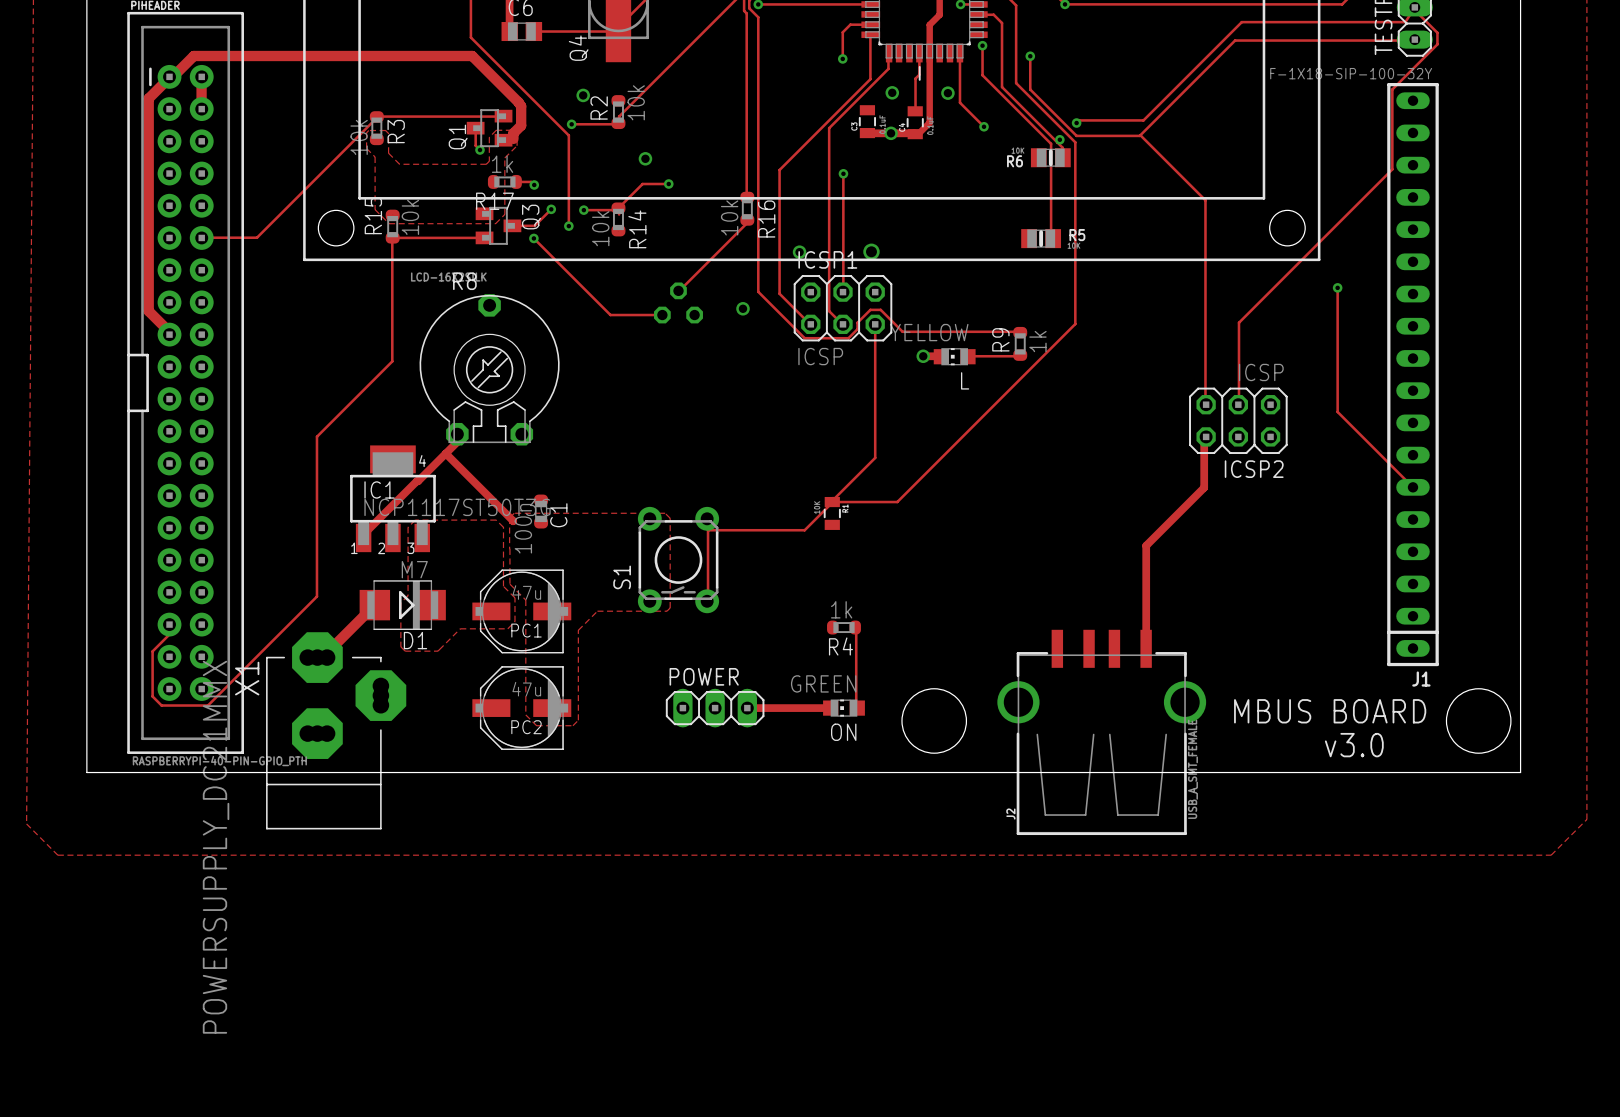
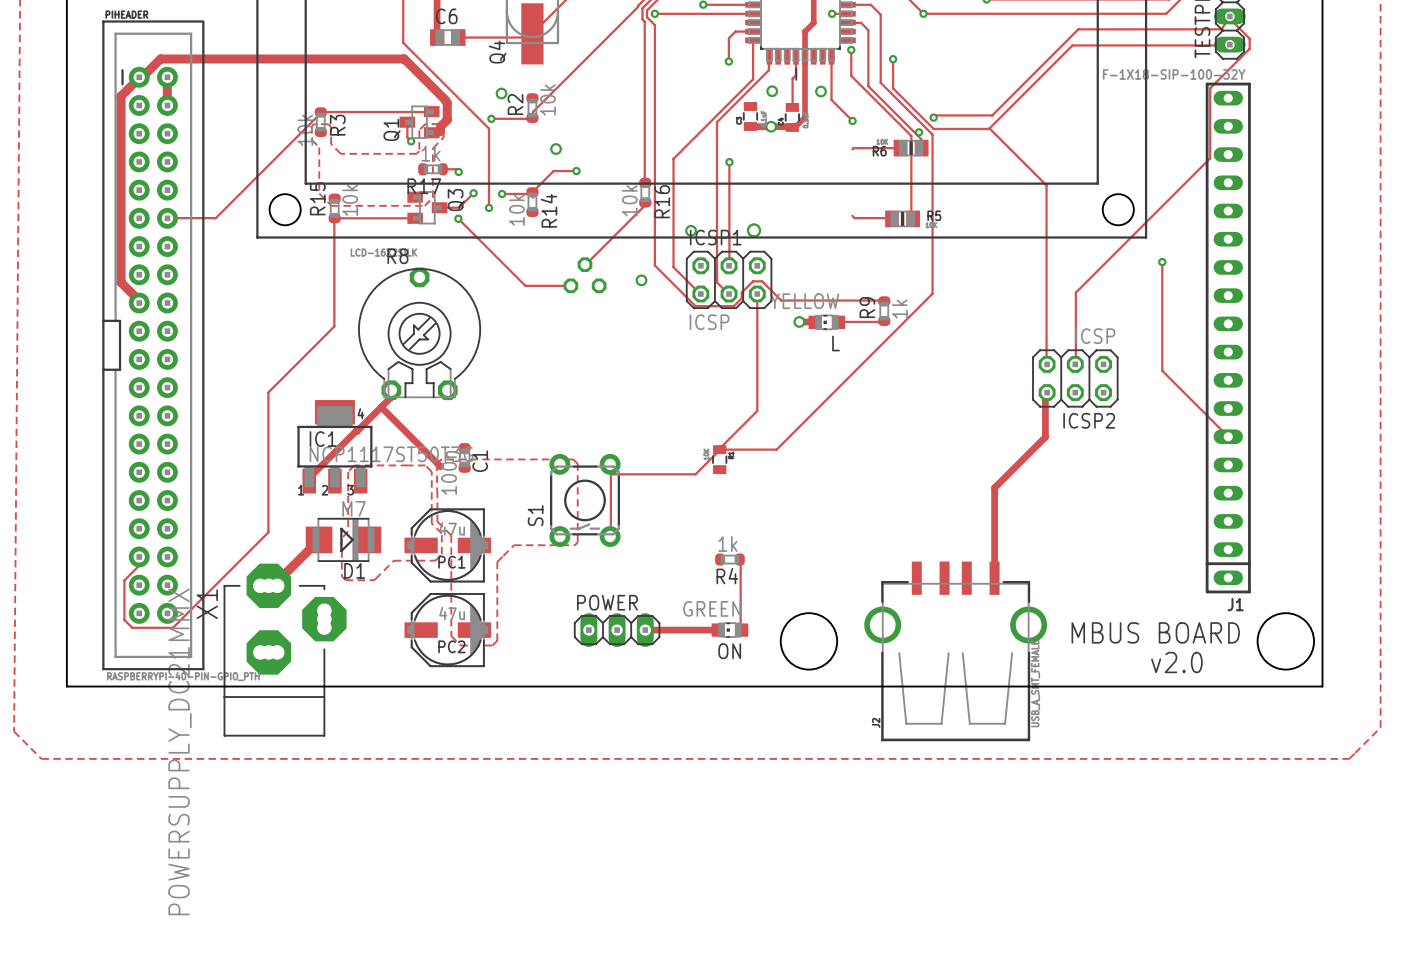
track: none -> (900, 148) (852, 149)
track: none -> (852, 215) (854, 218) (892, 218)
text: v3.0 (1354, 745) -> v2.0 (1176, 662)

